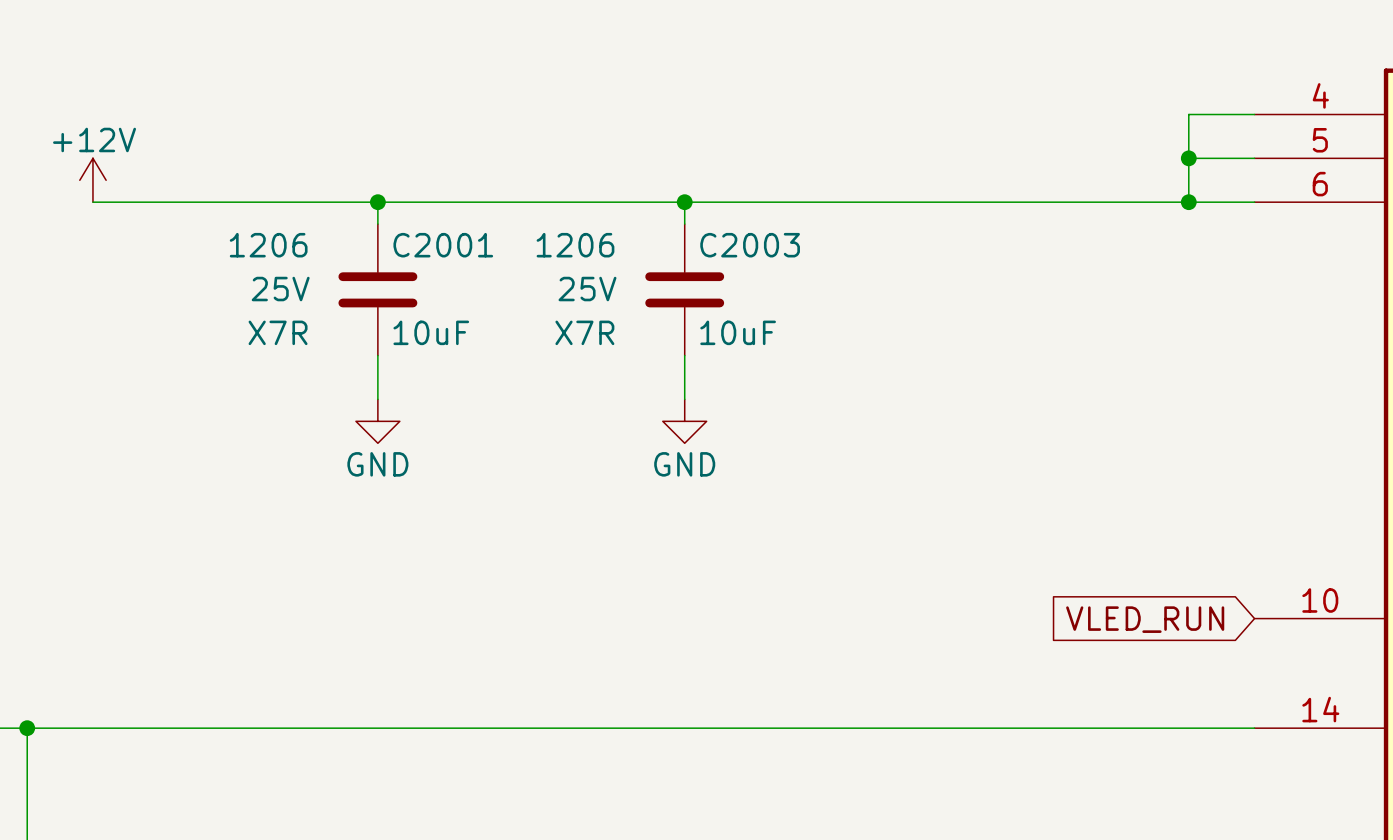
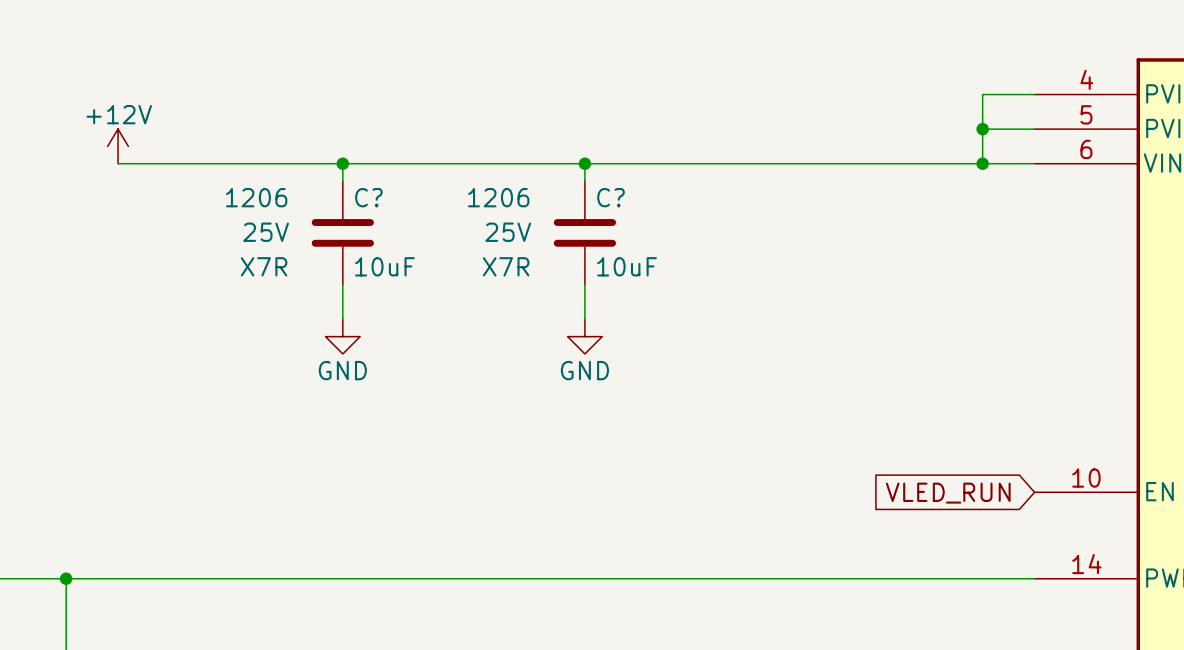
C2001 name: C2001 (443, 245) -> C? (368, 197)
C2003 name: C2003 (750, 245) -> C? (610, 197)

